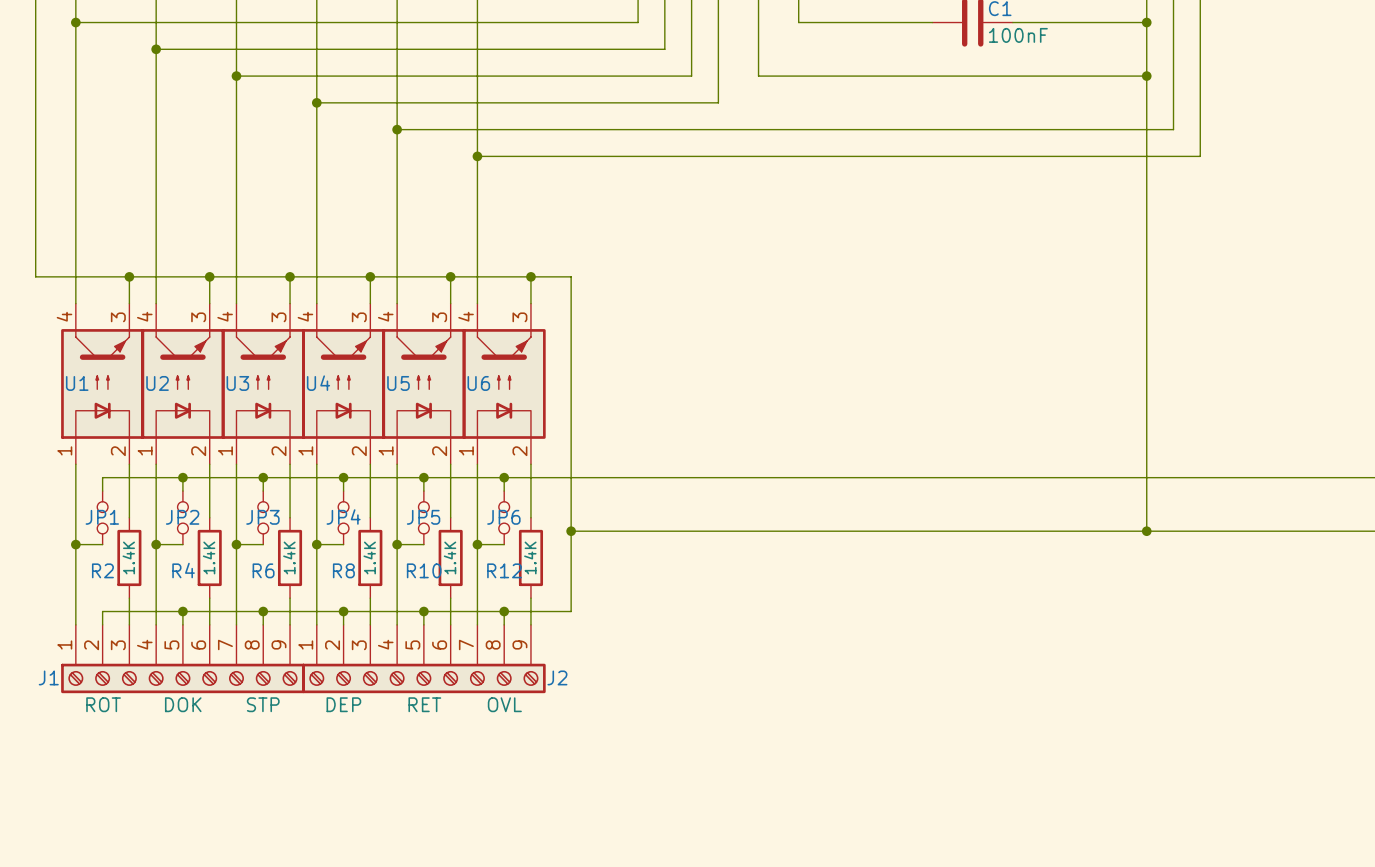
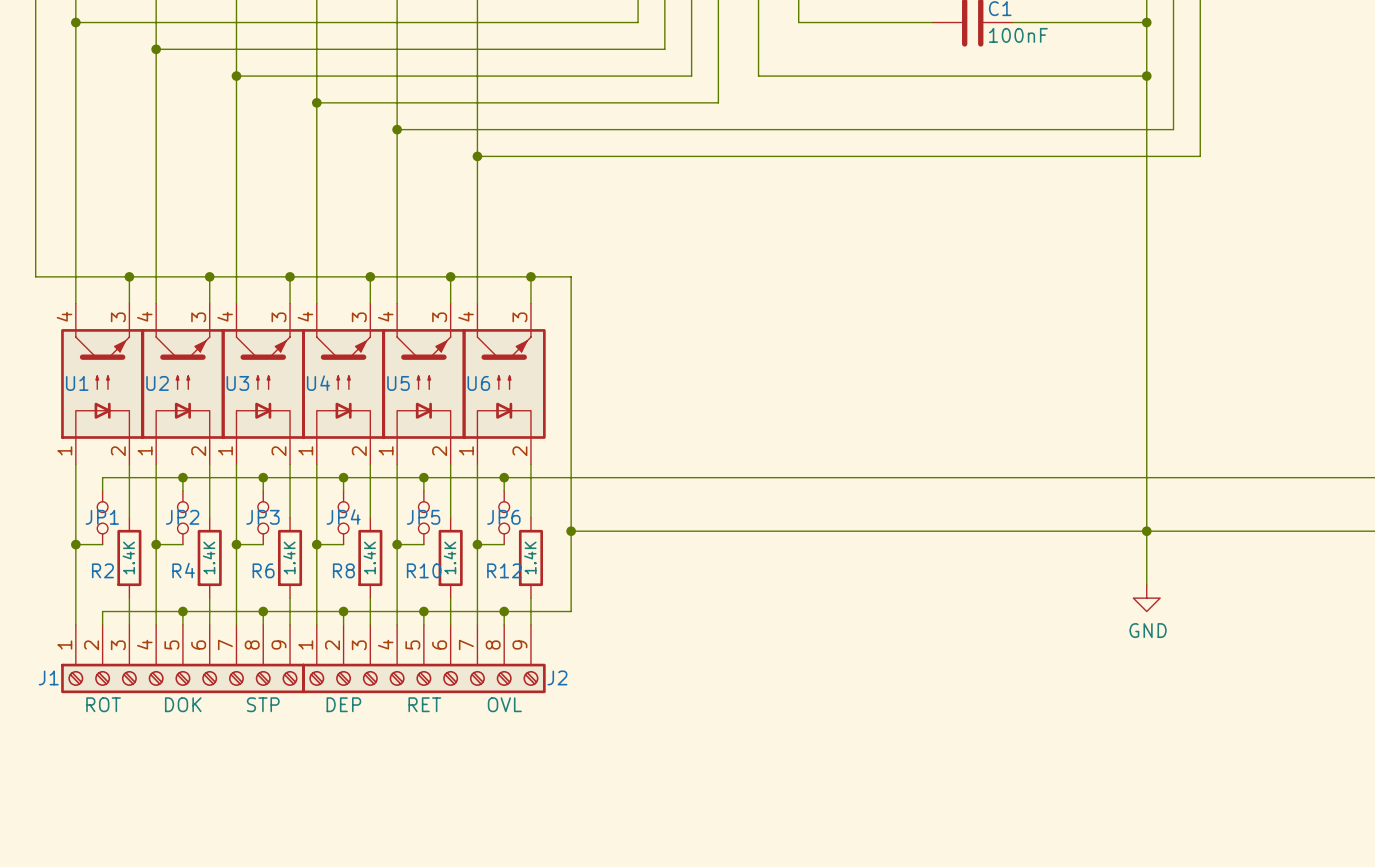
wire: none -> (1146, 531) (1146, 584)
power symbol: none -> GND (1146, 598)

